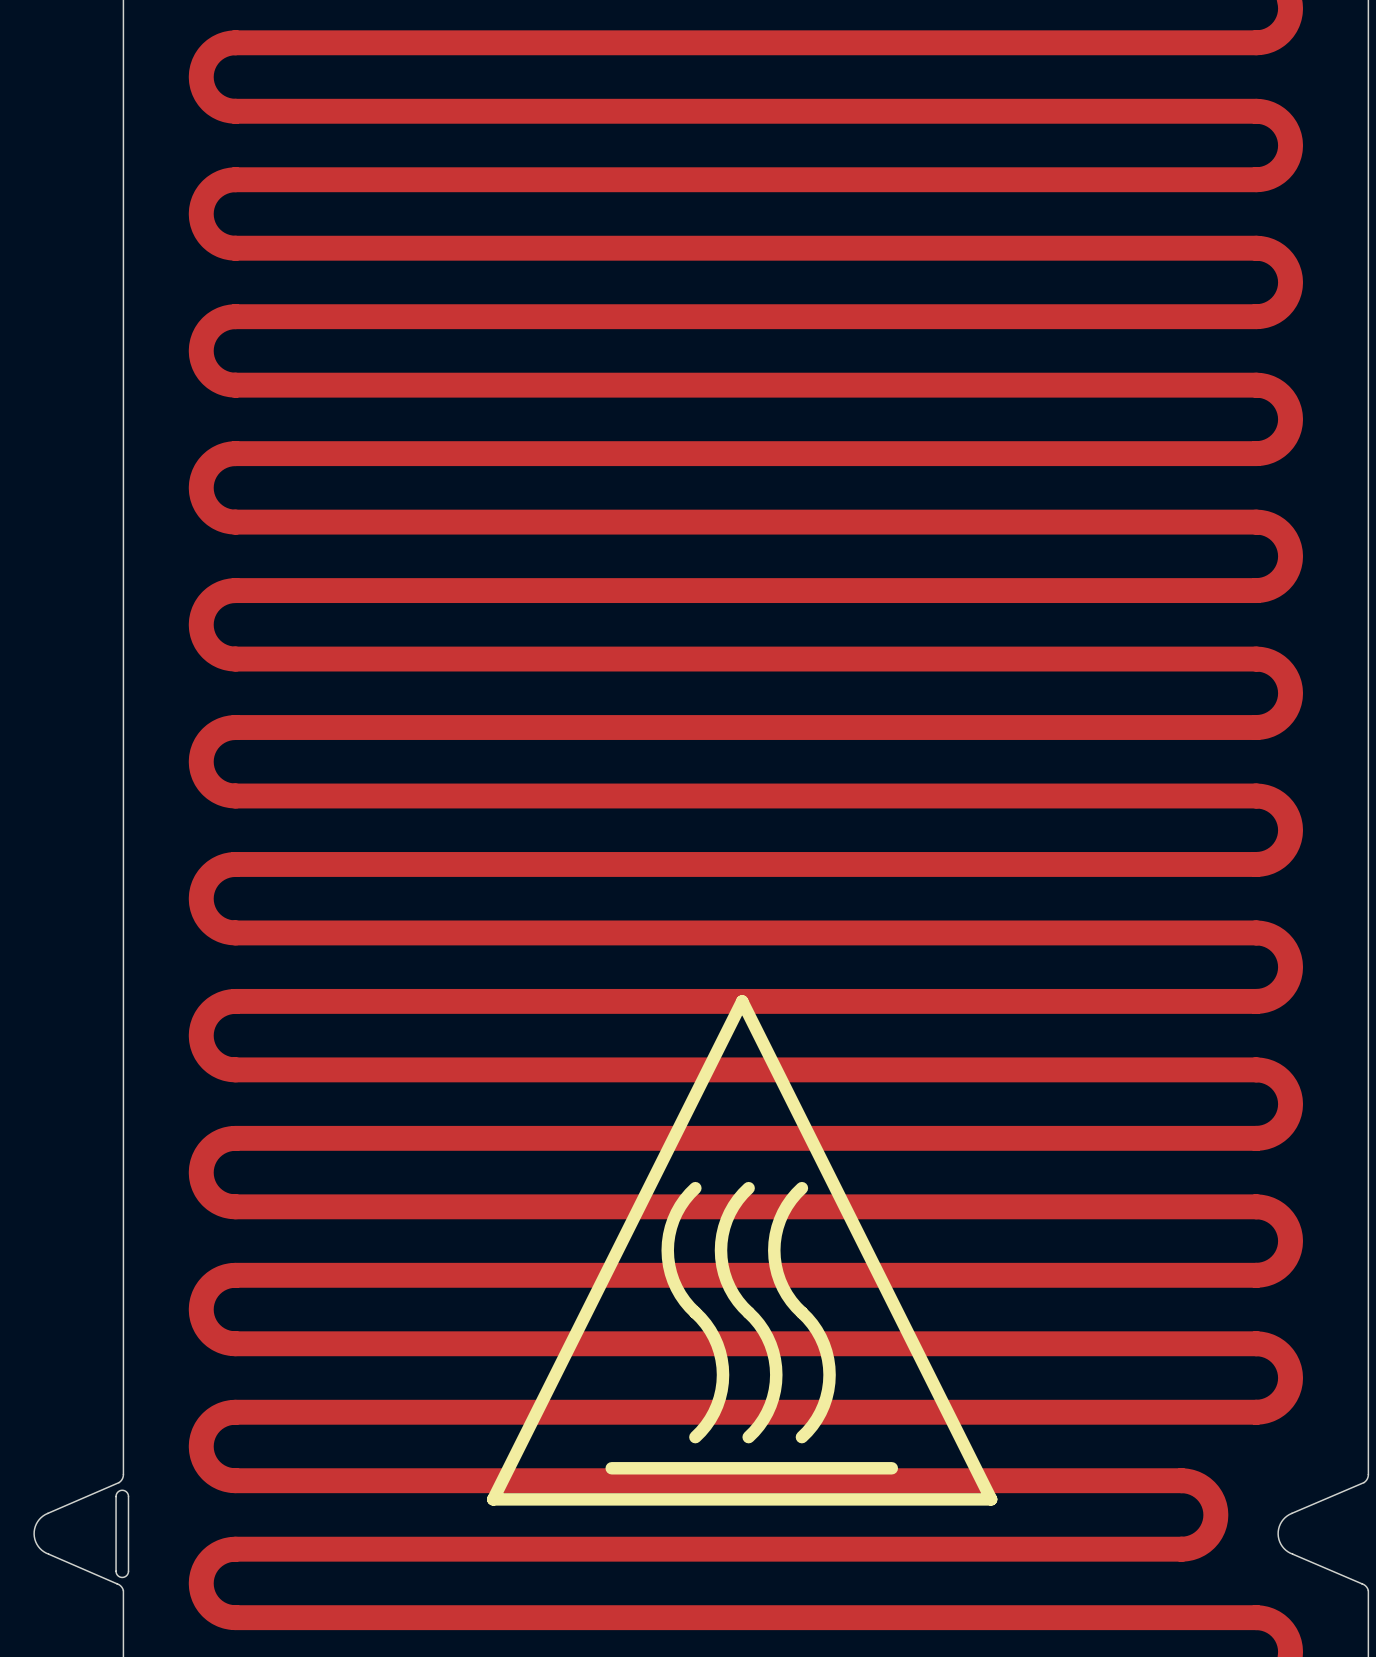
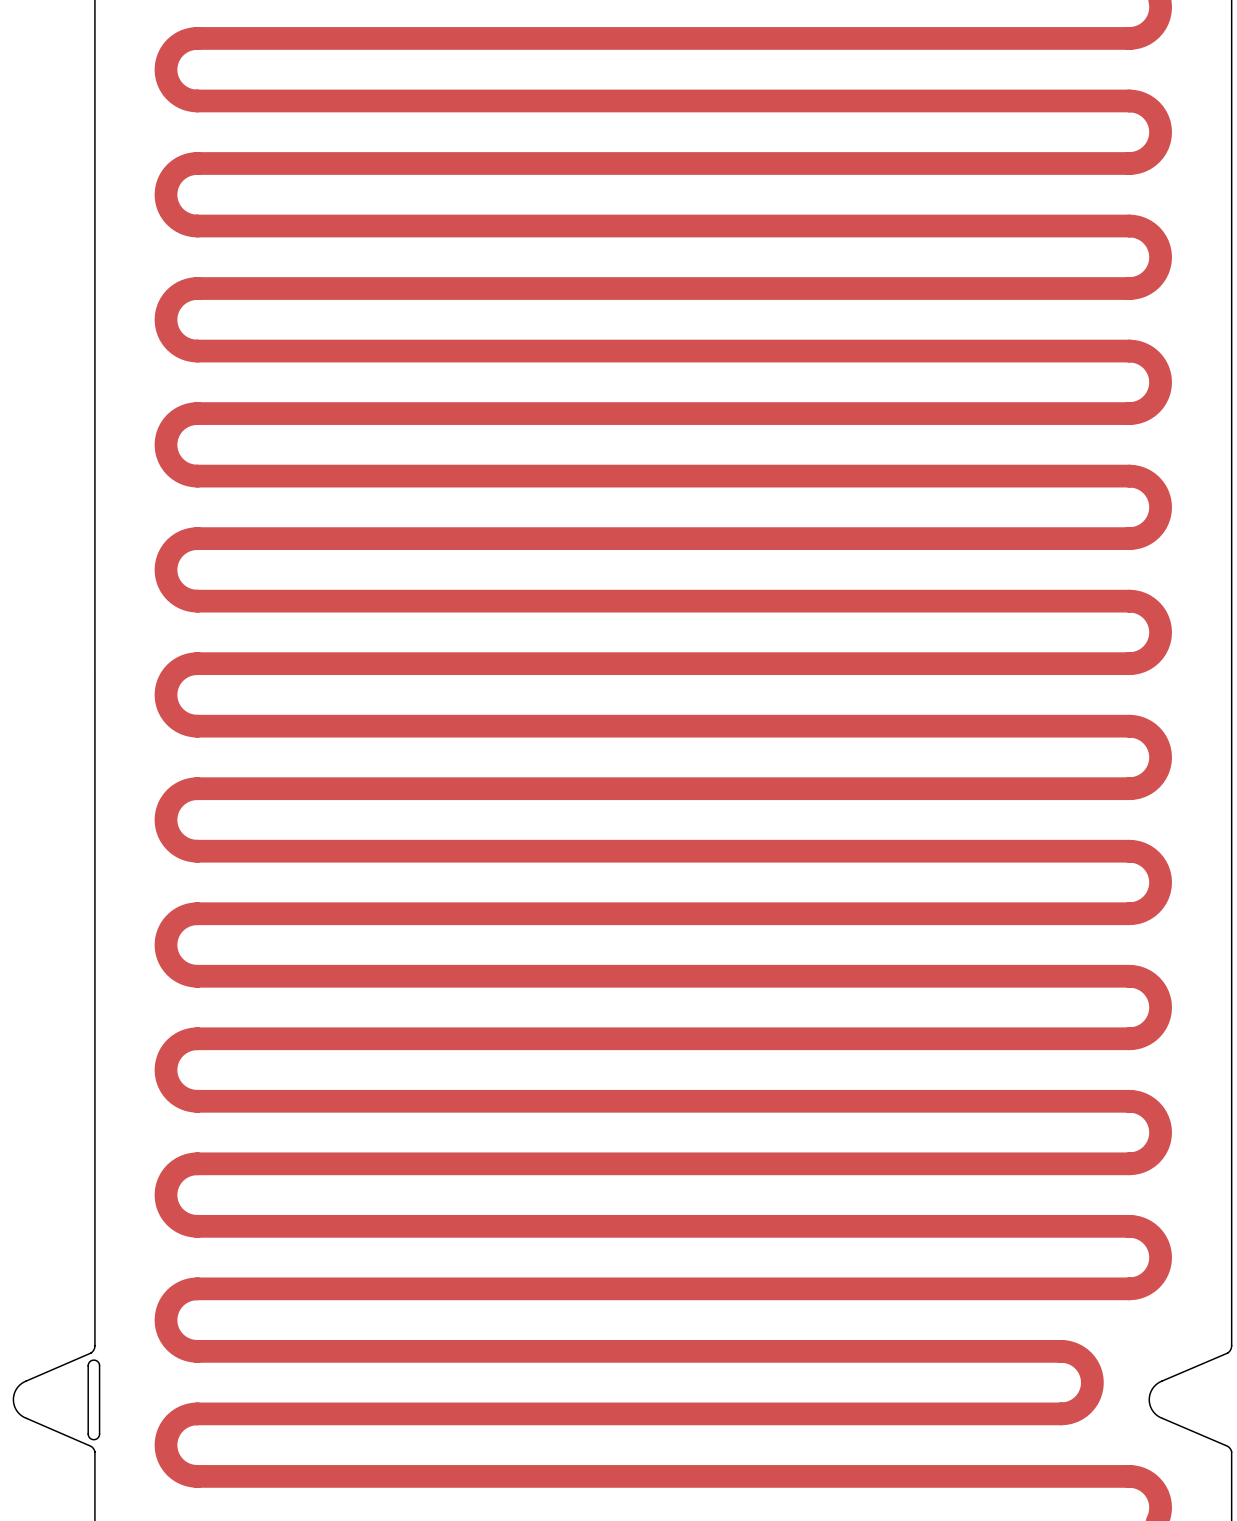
line: (742, 1001) (493, 1499) (991, 1499) (742, 1001) -> none
line: (695, 1188) (680, 1206) (670, 1227) (668, 1242) (669, 1265) (680, 1294) (705, 1324) (714, 1337) (721, 1359) (723, 1374) (717, 1405) (710, 1419) (695, 1437) -> none
line: (748, 1188) (733, 1206) (724, 1227) (721, 1250) (722, 1265) (733, 1294) (759, 1324) (767, 1337) (774, 1359) (776, 1374) (773, 1397) (767, 1412) (748, 1437) -> none
line: (801, 1188) (786, 1206) (779, 1219) (774, 1250) (775, 1265) (783, 1287) (791, 1301) (816, 1330) (828, 1359) (829, 1382) (826, 1397) (816, 1419) (801, 1437) -> none
line: (611, 1468) (891, 1468) -> none

